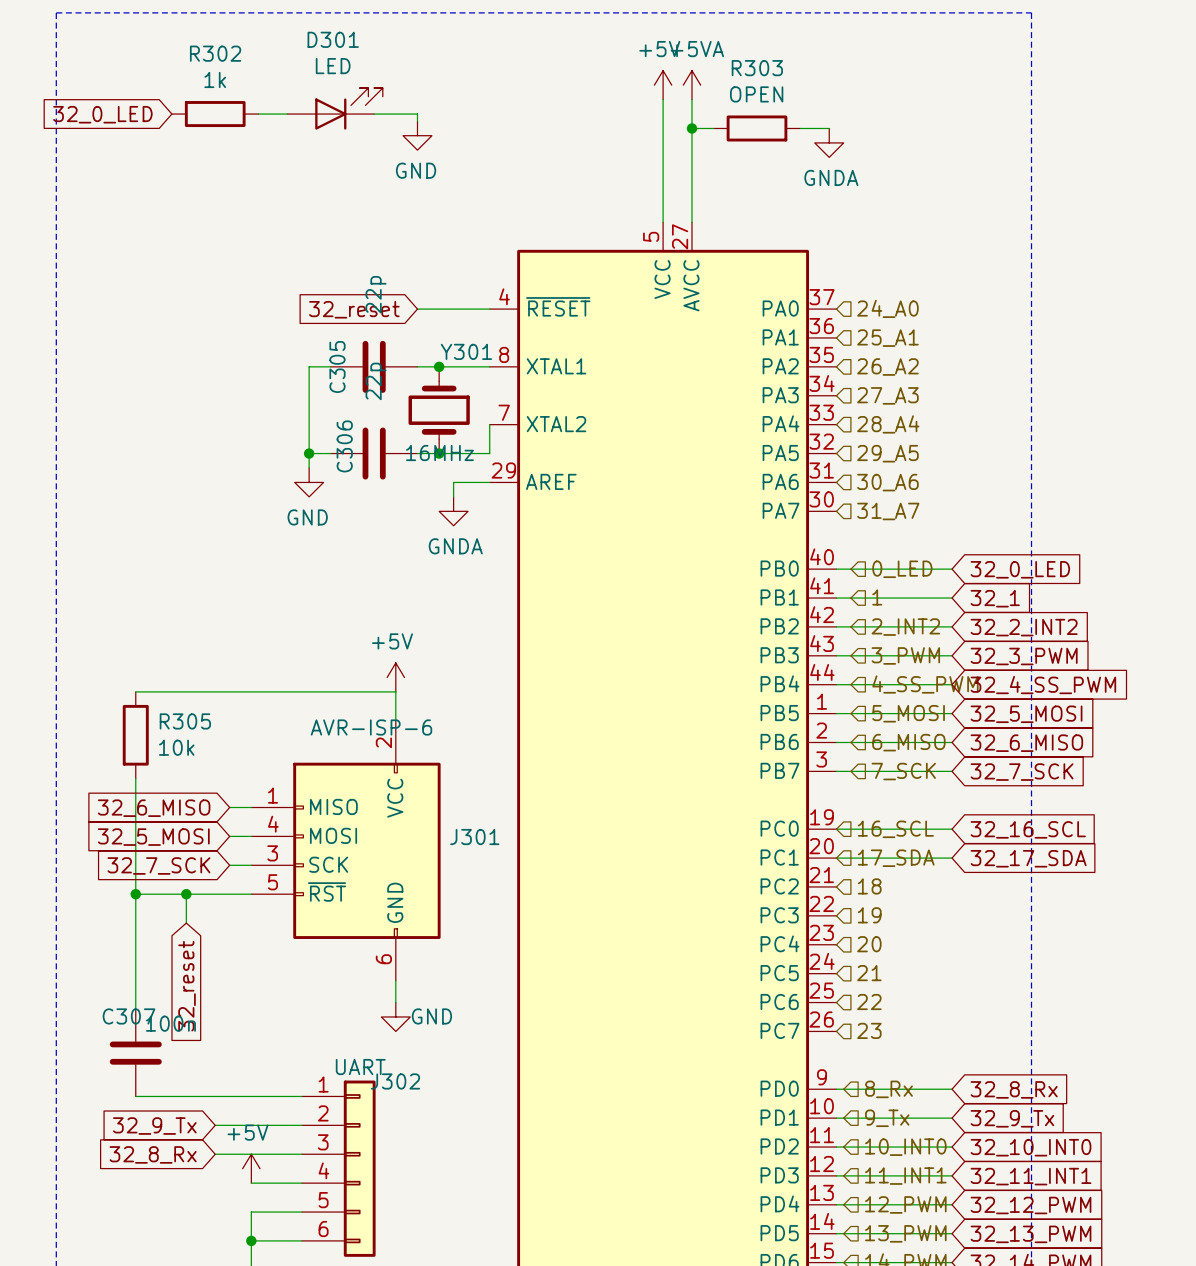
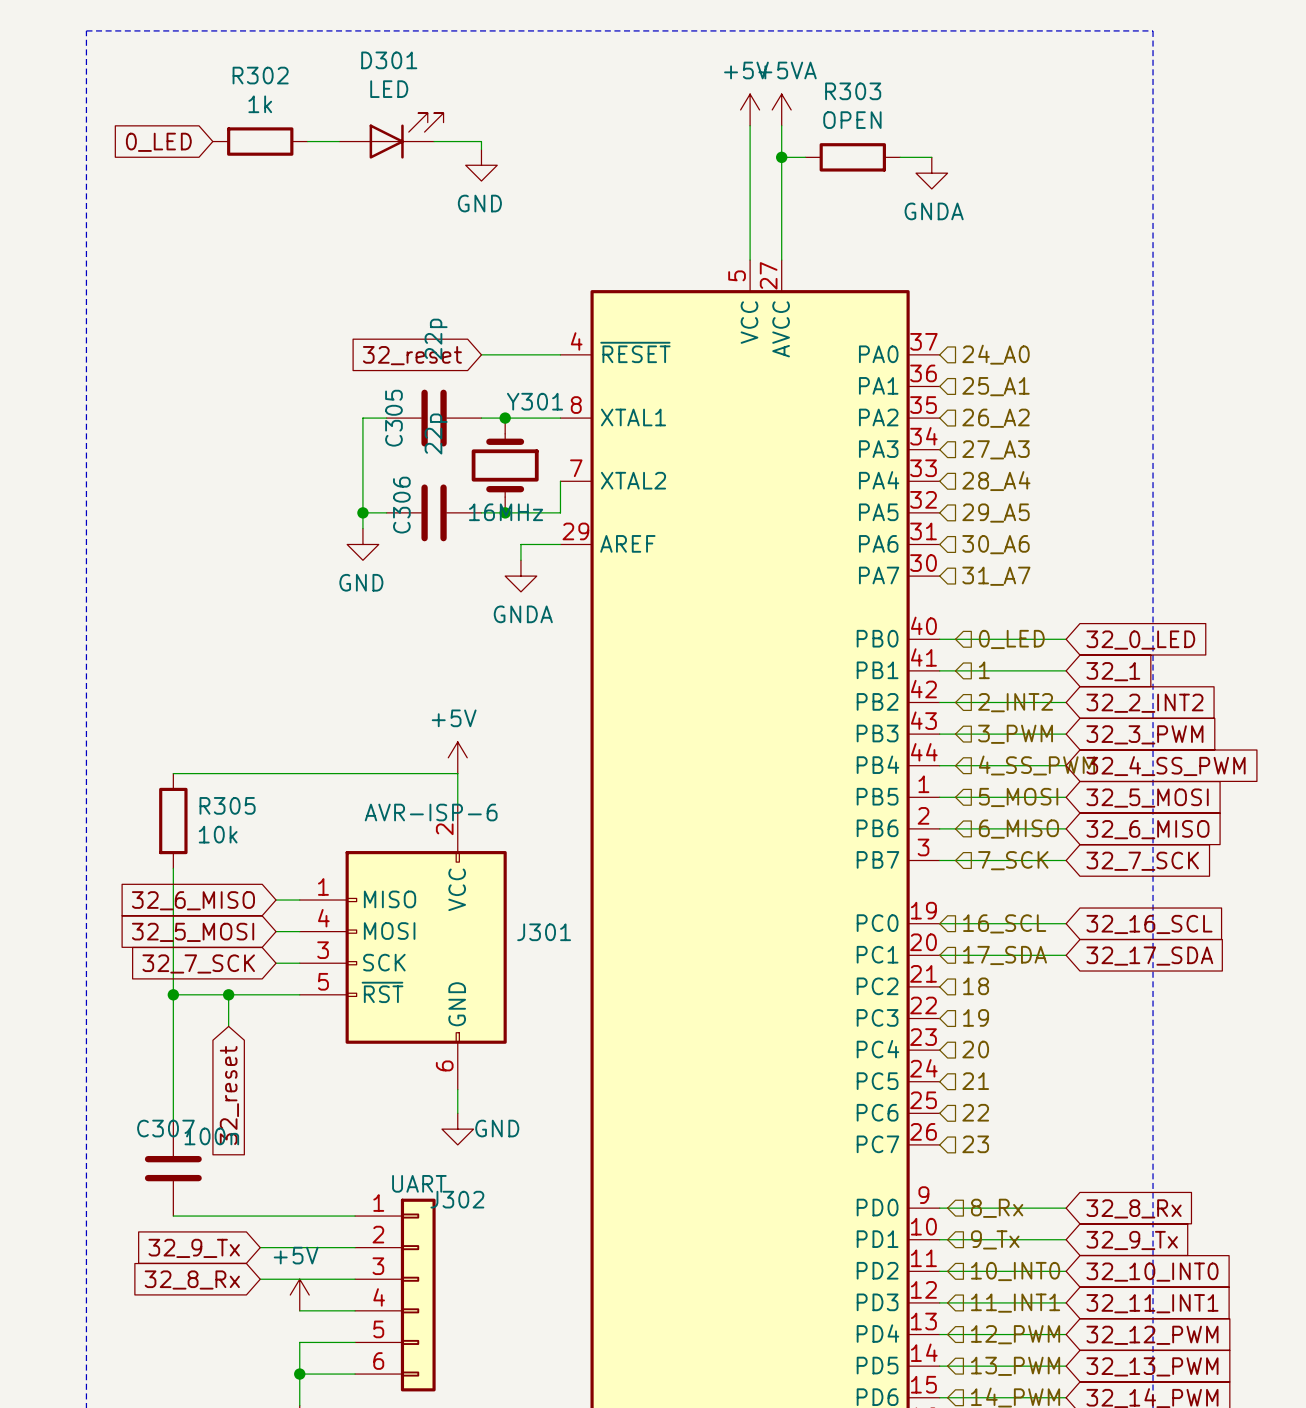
global label: 32_0_LED (102, 114) -> 0_LED (158, 142)

